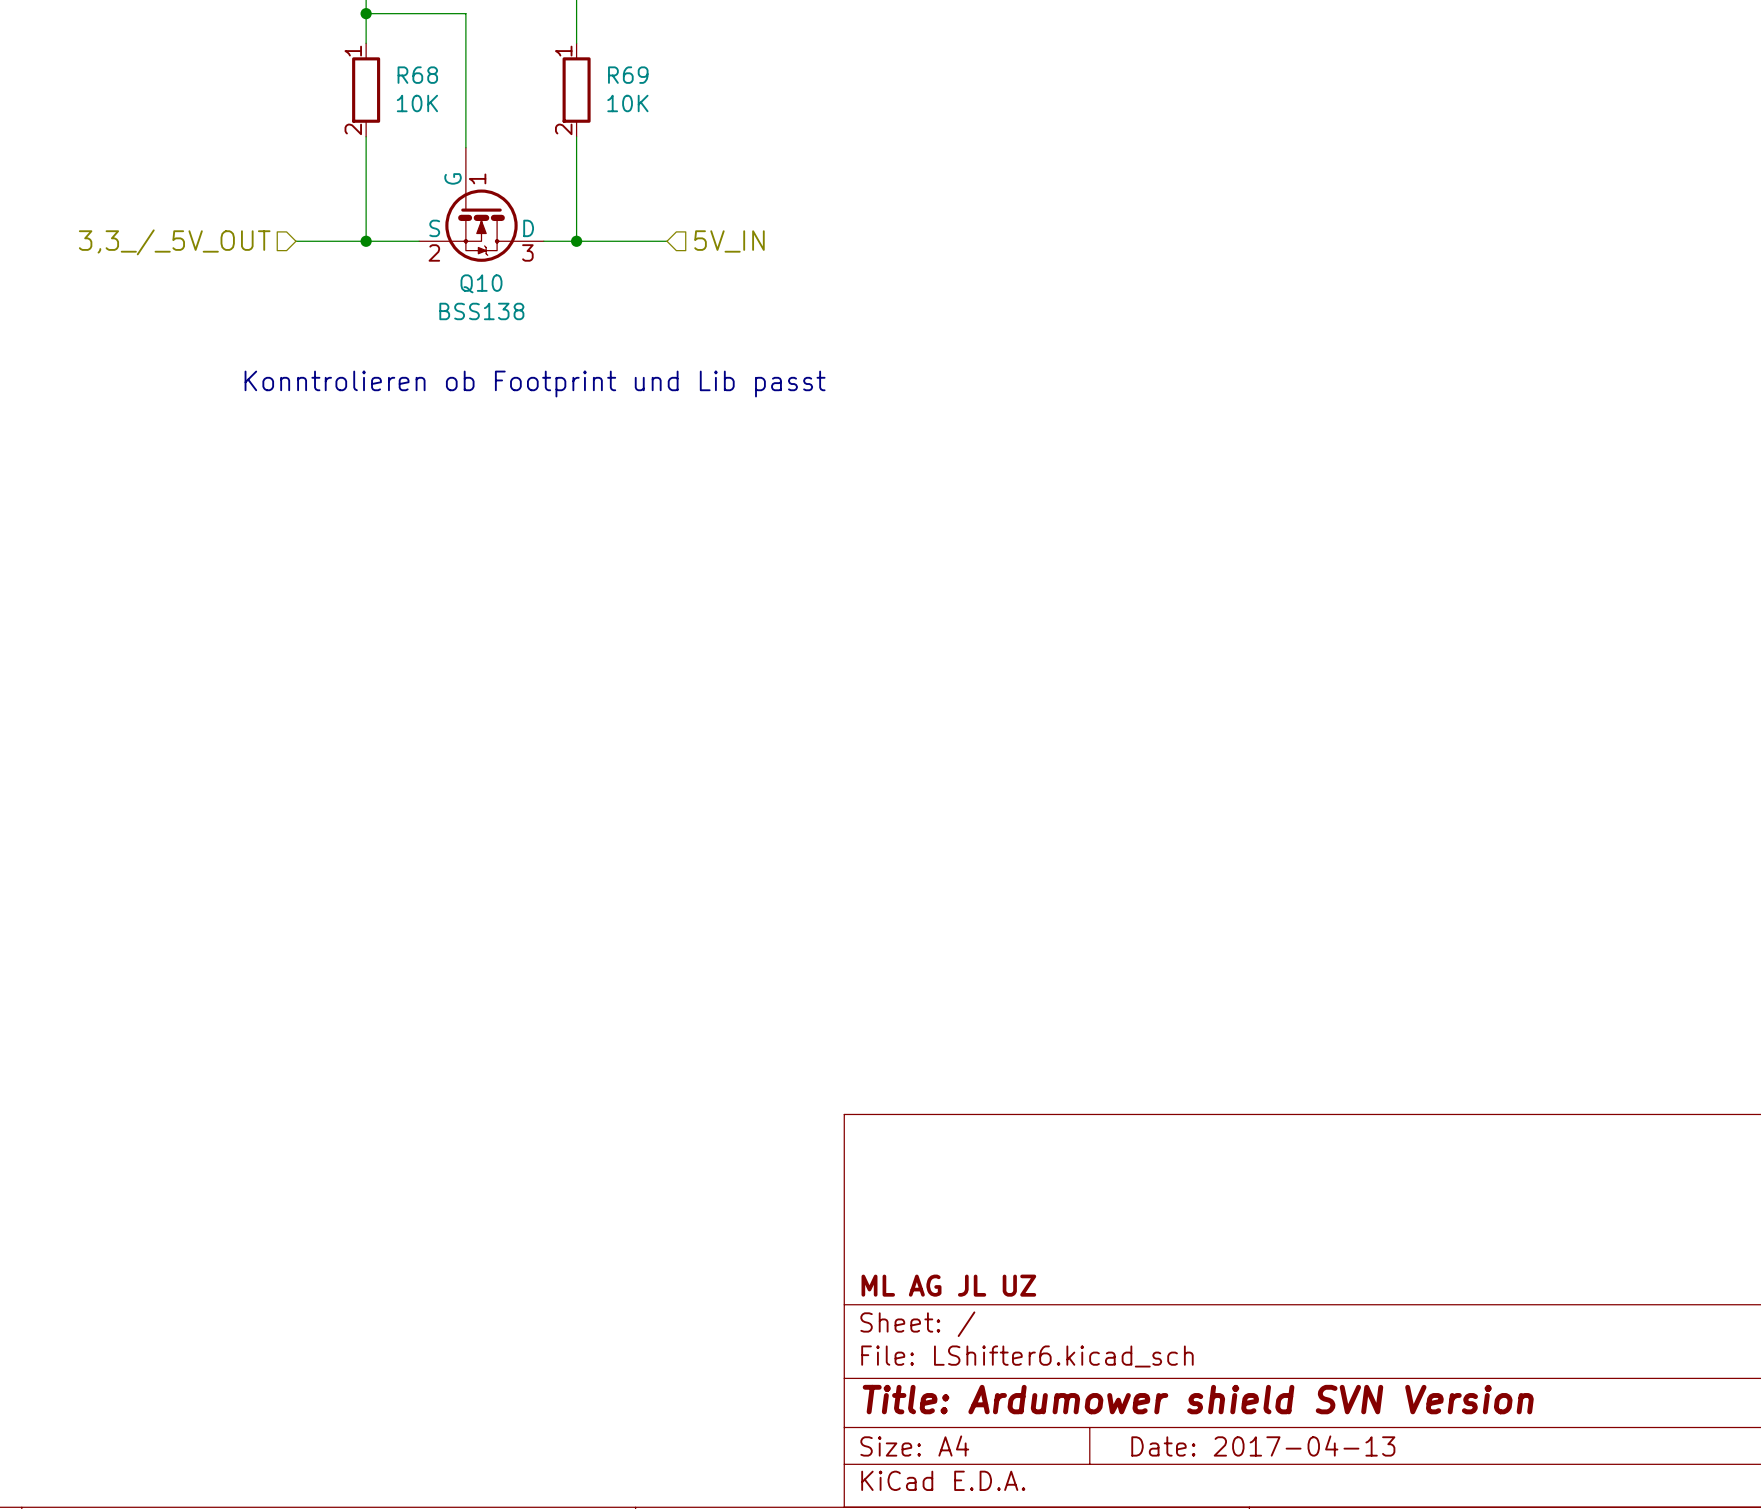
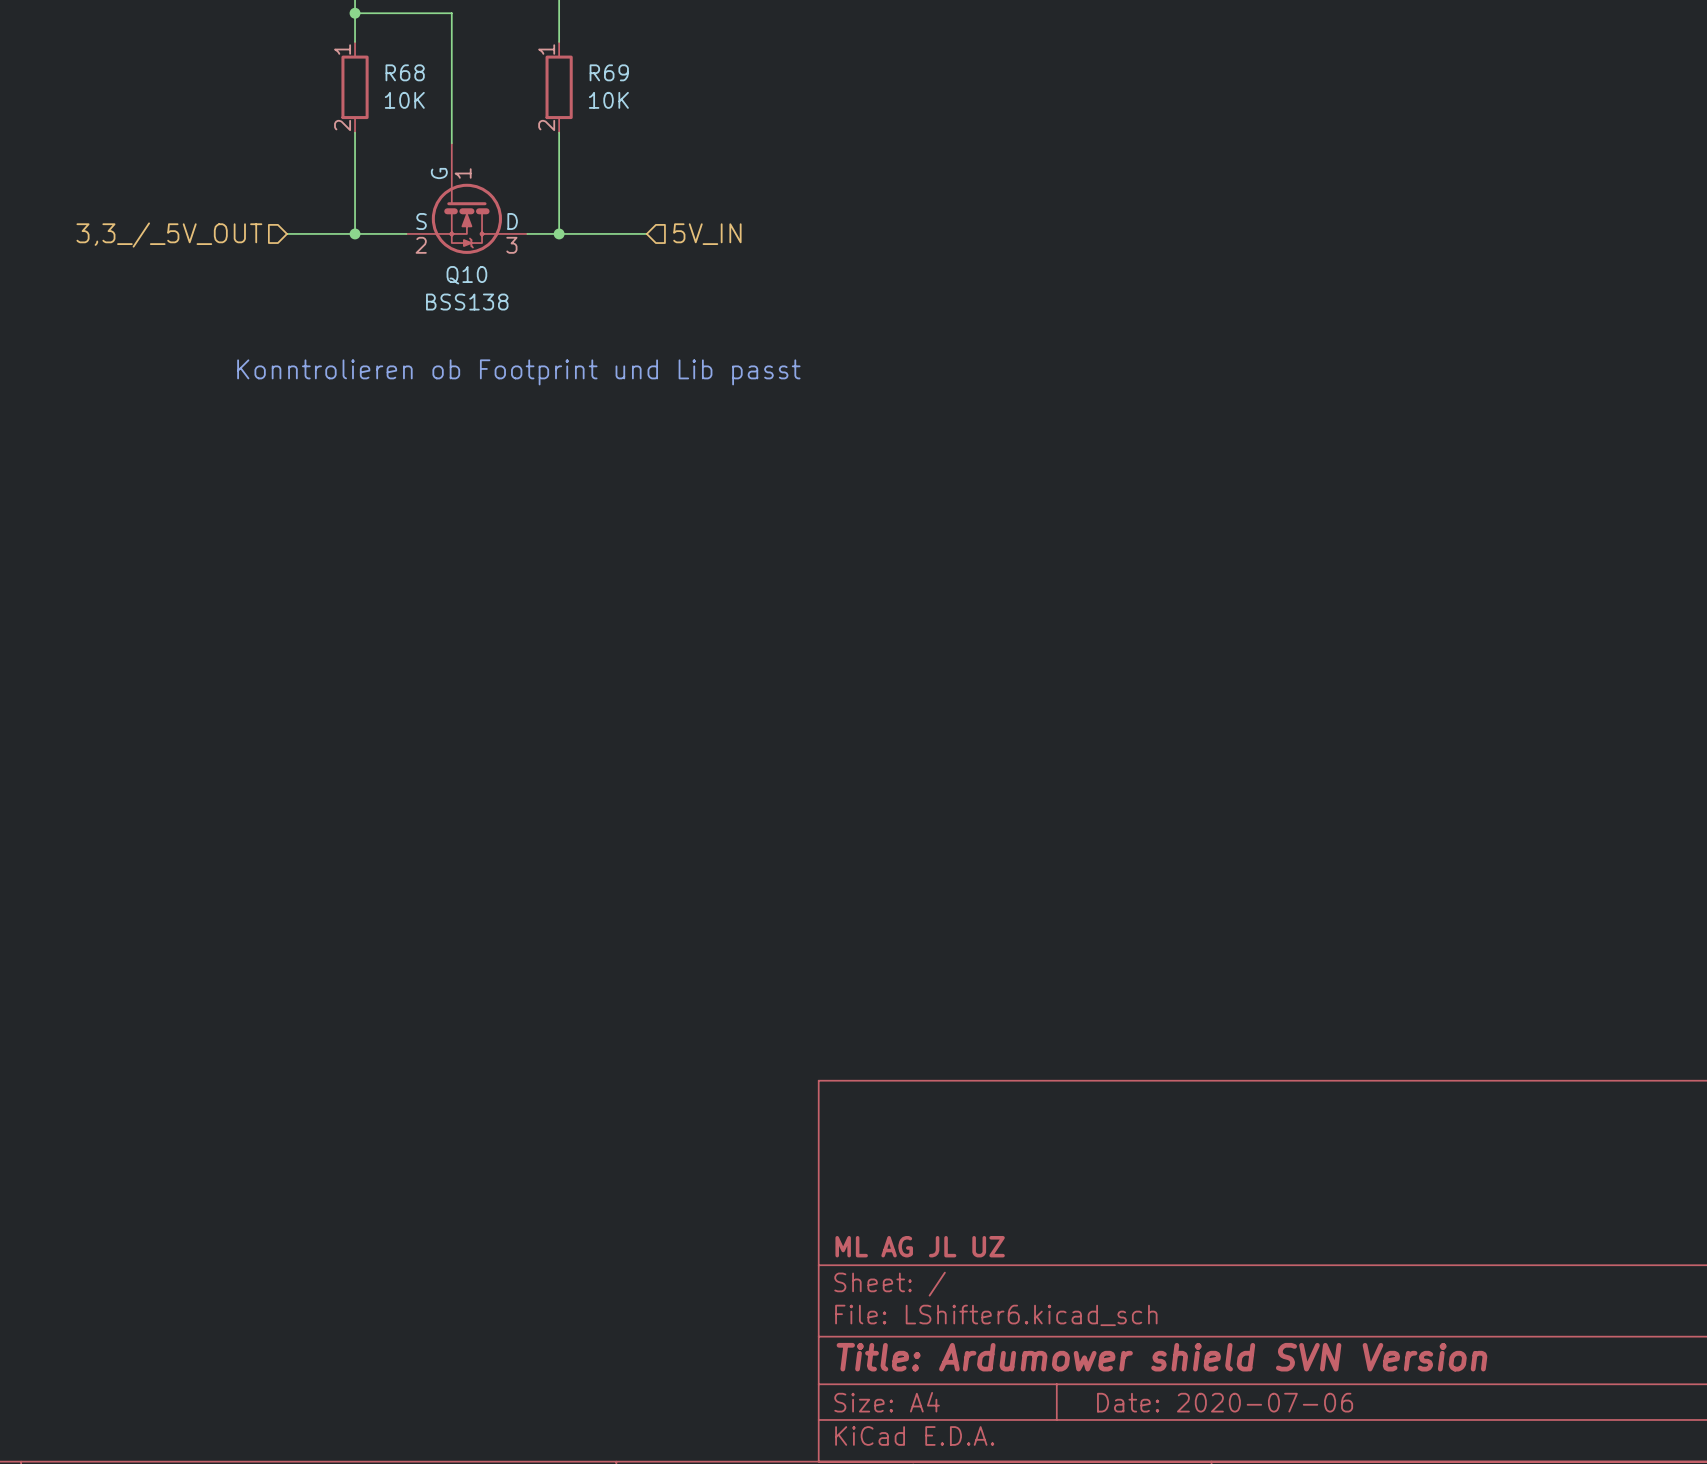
title block: Date: 2017-04-13 (1263, 1446) -> Date: 2020-07-06 (1225, 1402)

